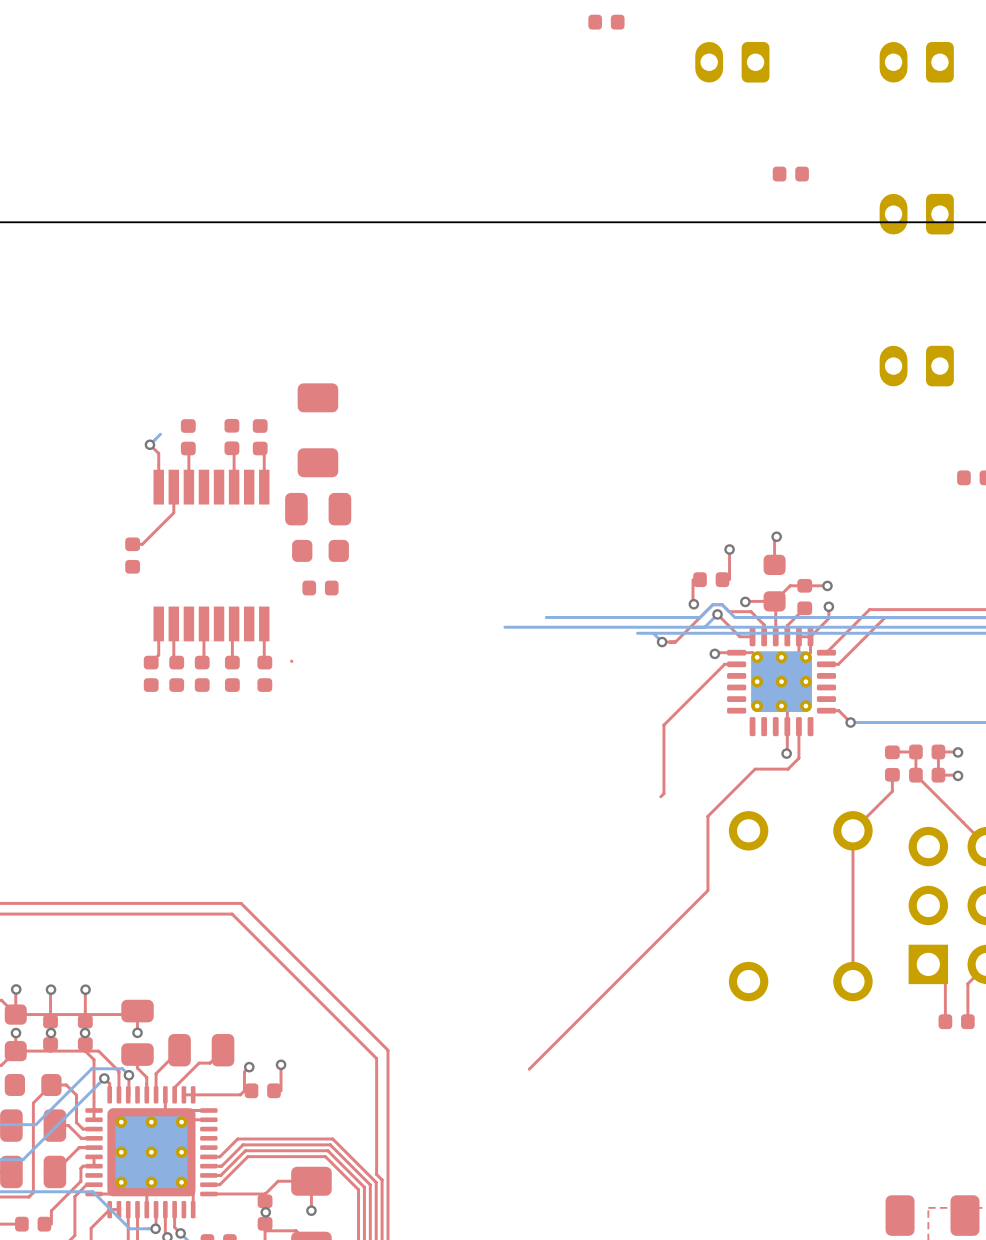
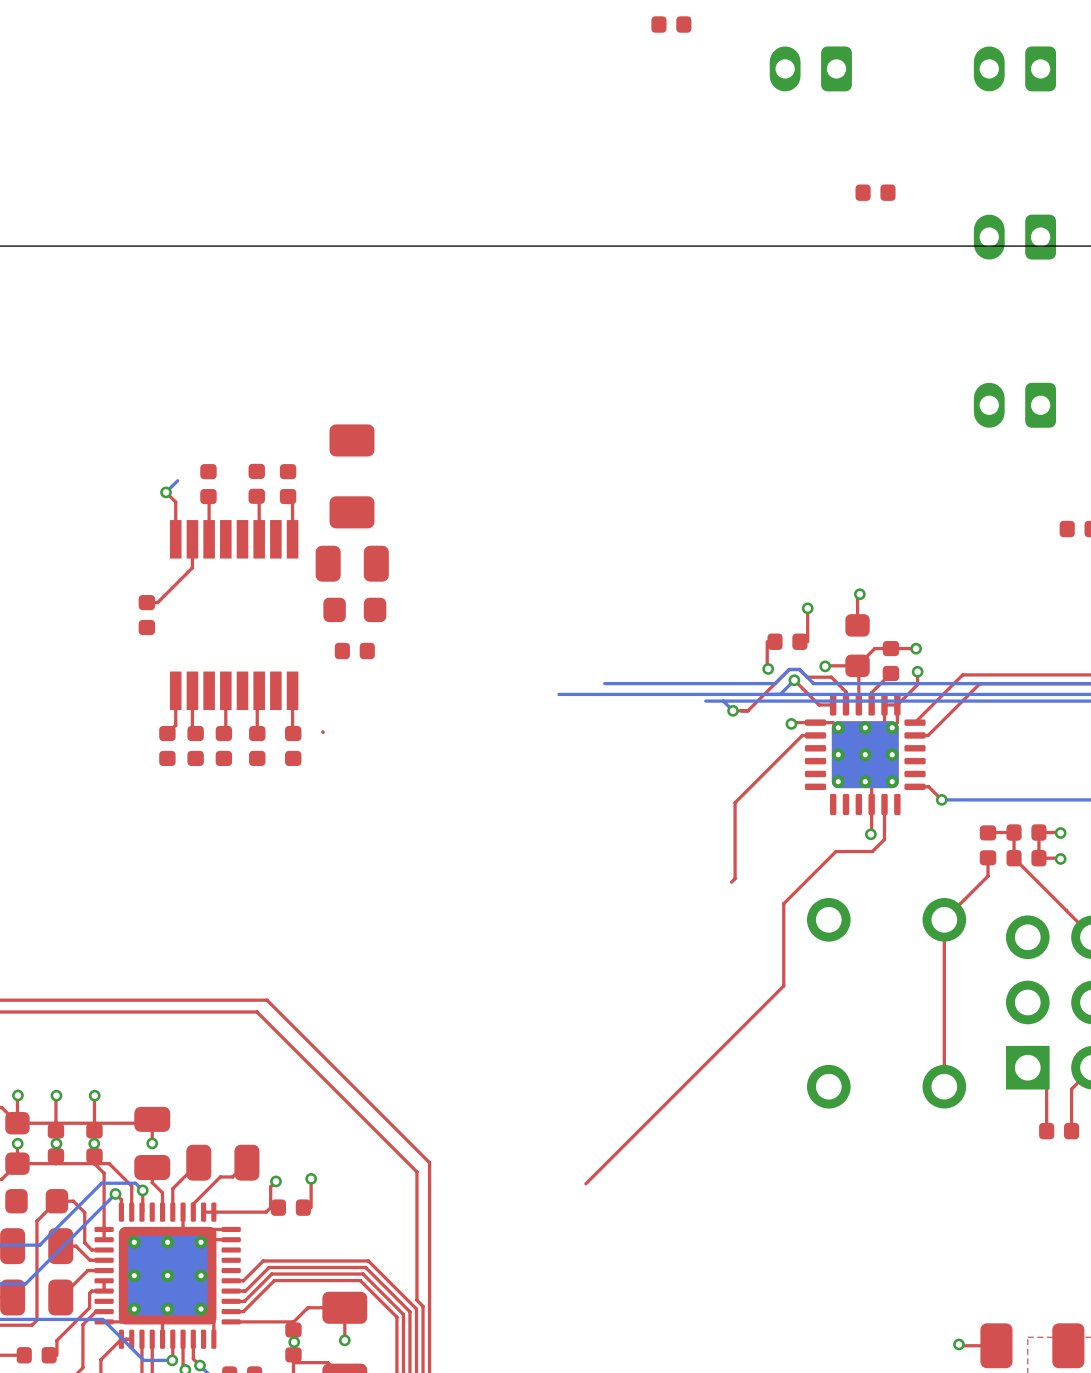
top track: none -> (958, 1344) (996, 1345)
via: none -> (958, 1344)

